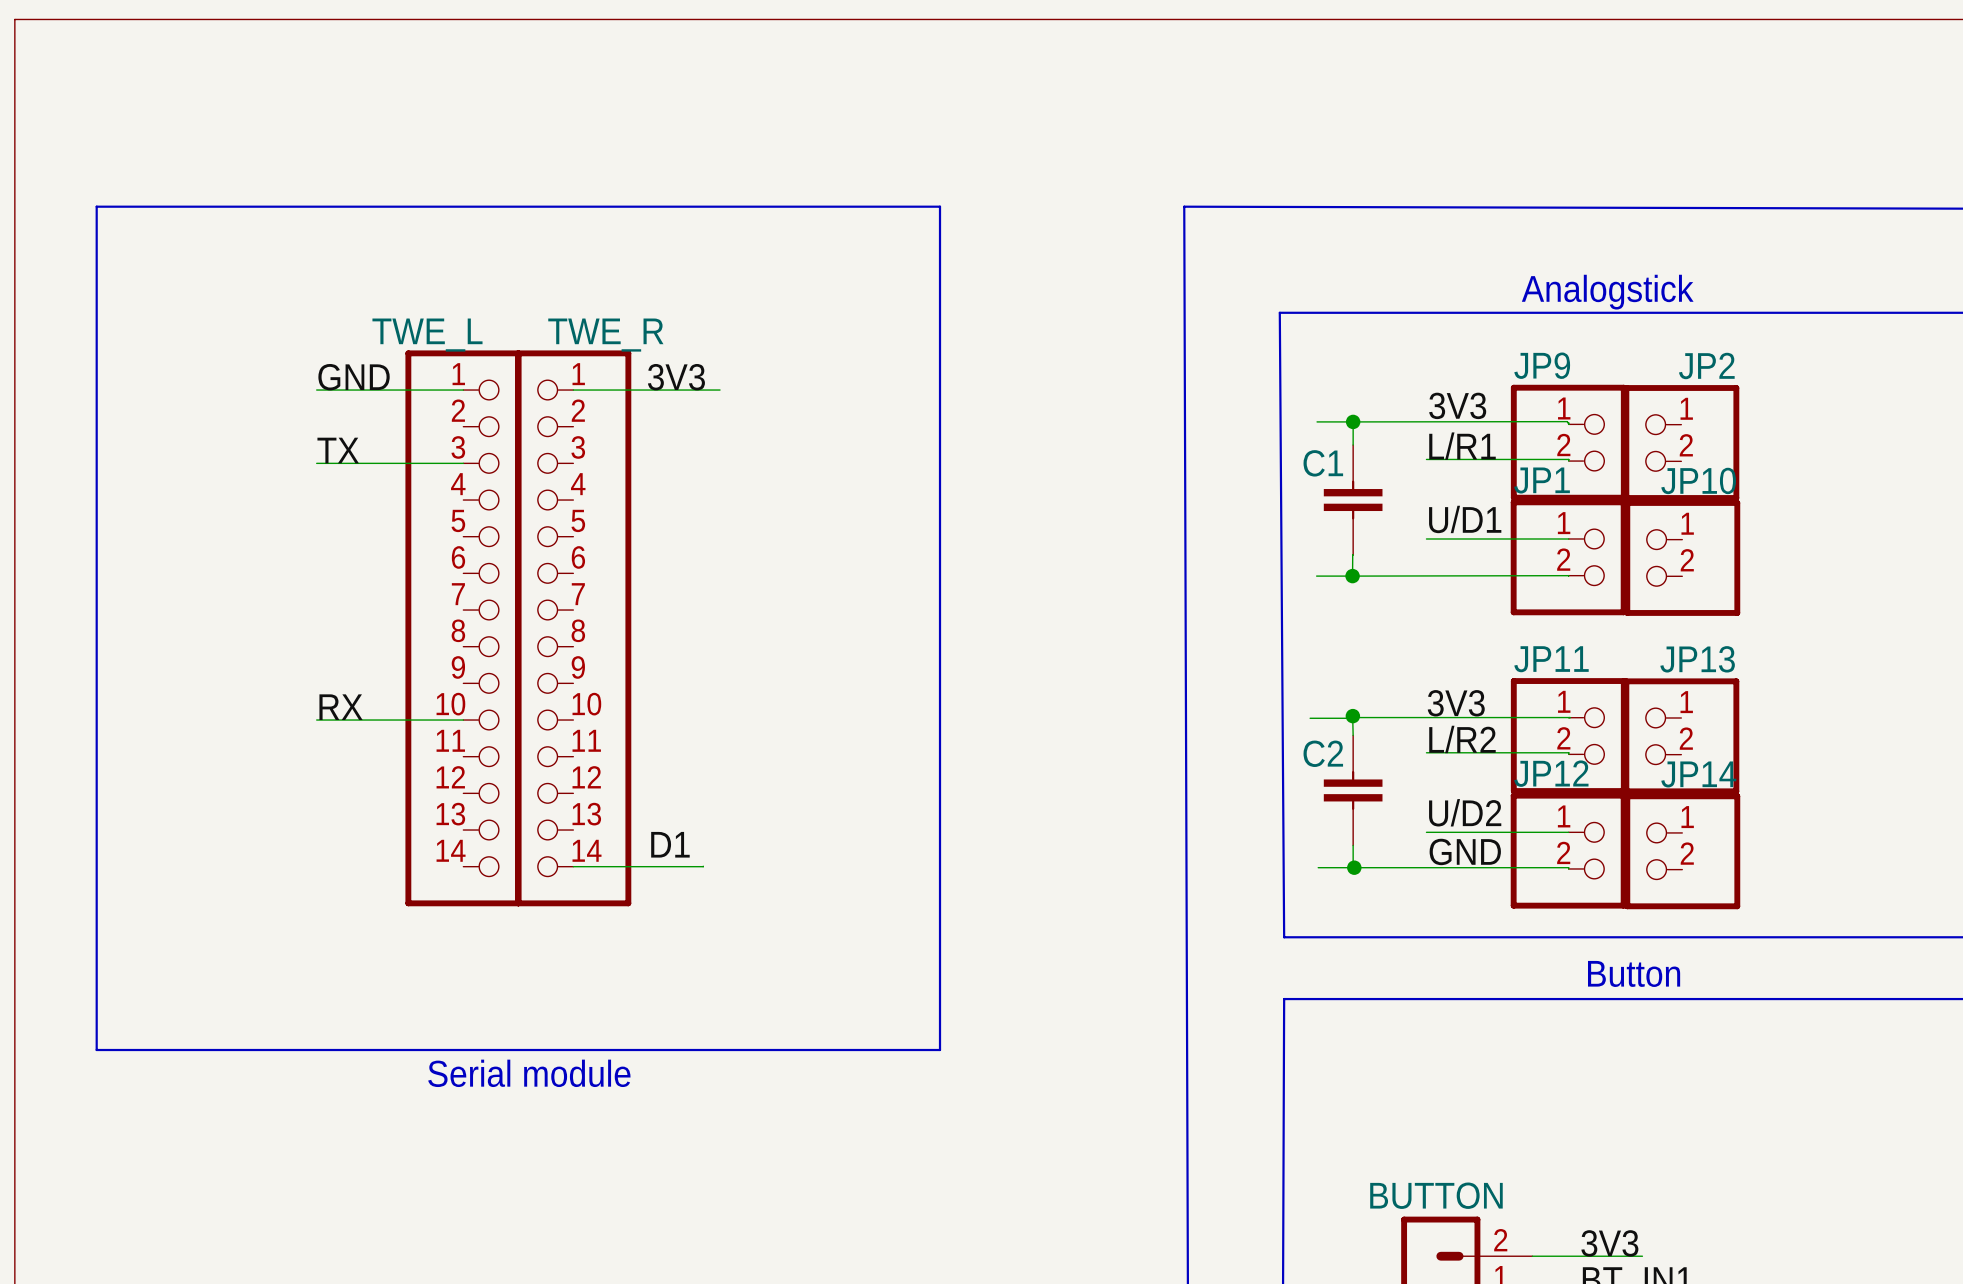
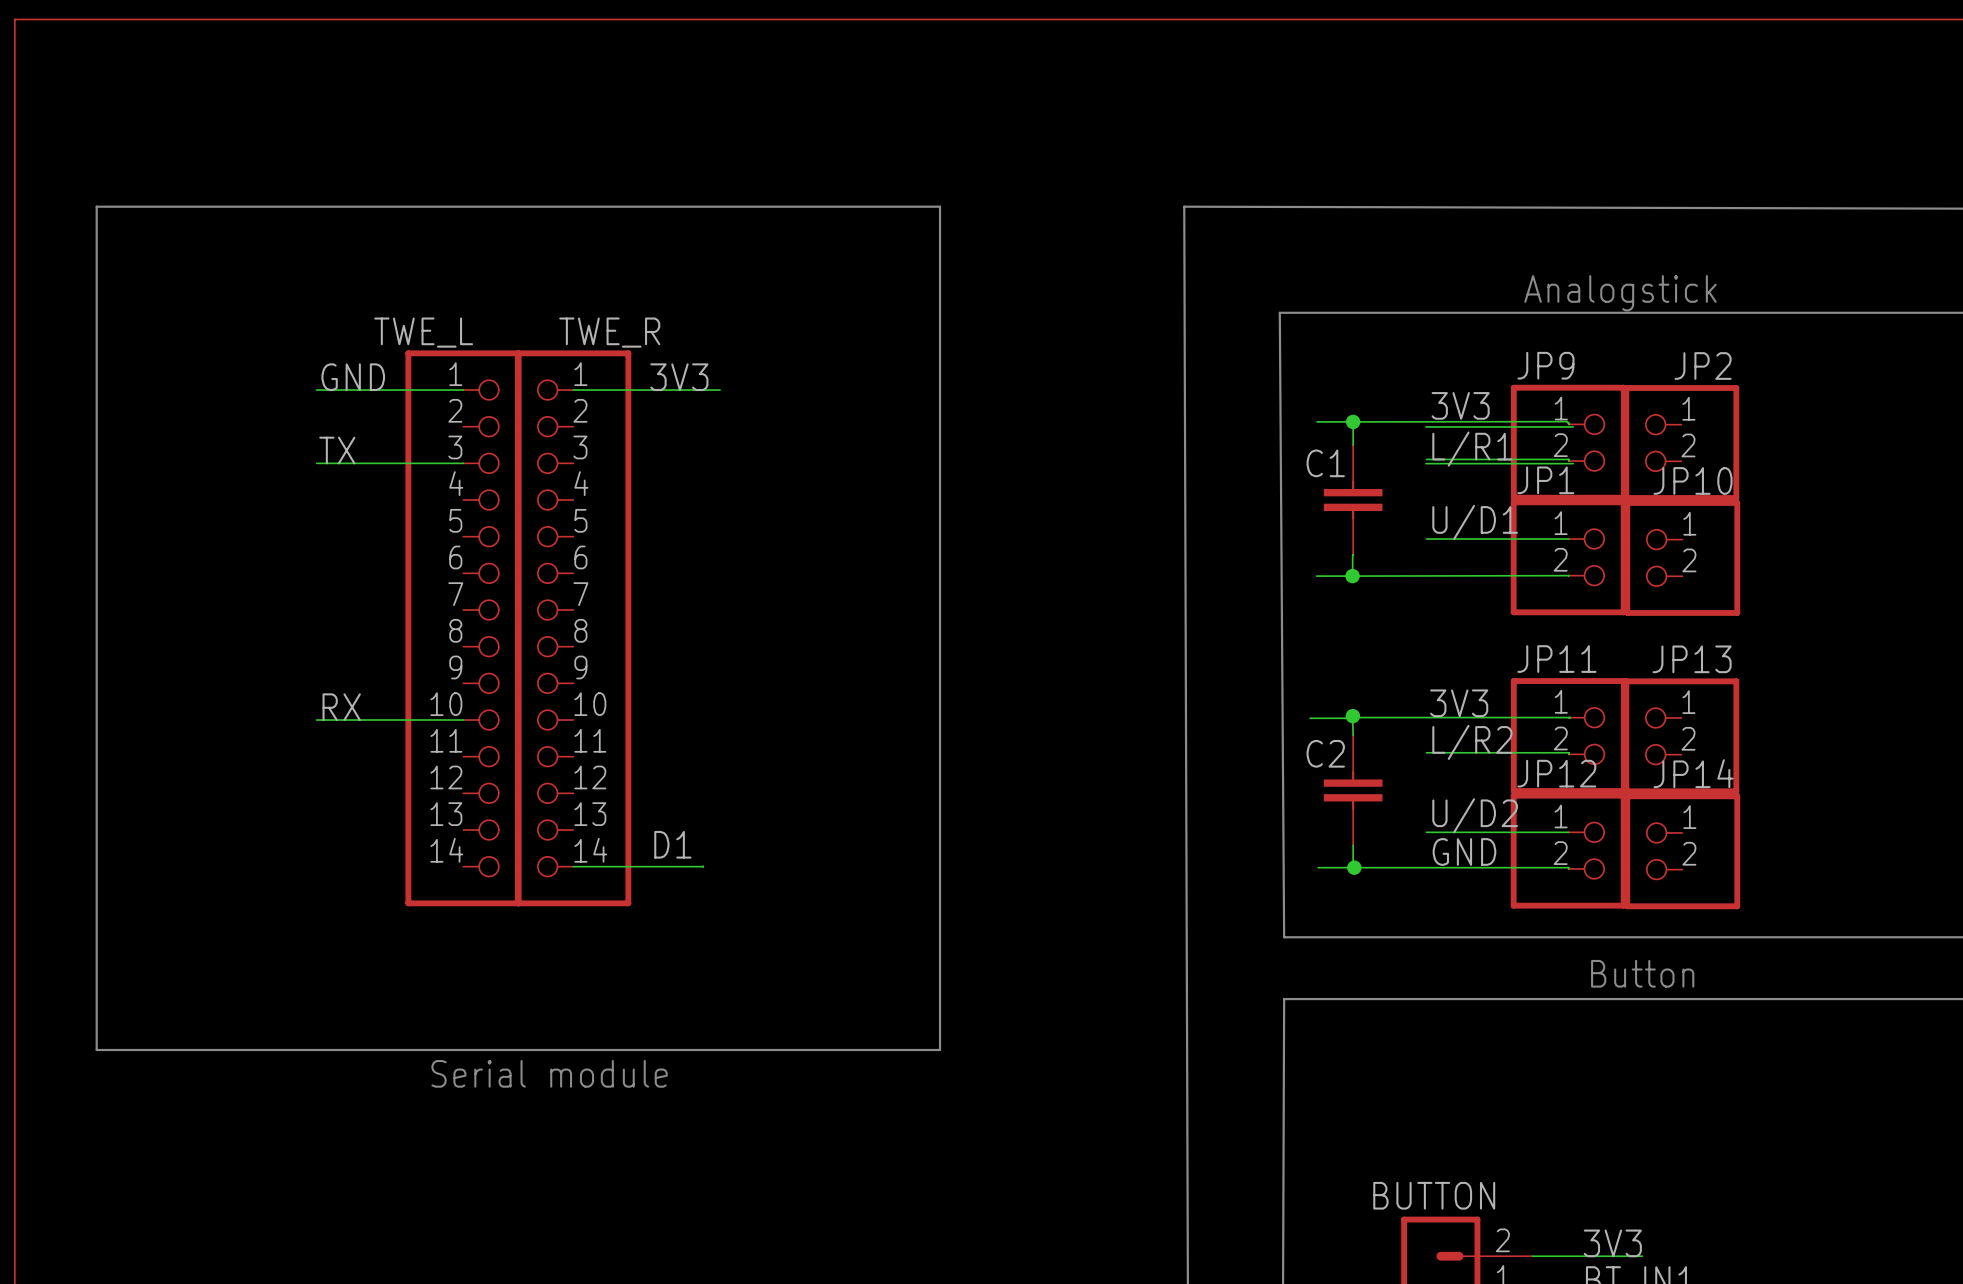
wire: none -> (1426, 426) (1573, 426)
wire: none -> (1426, 463) (1573, 463)

